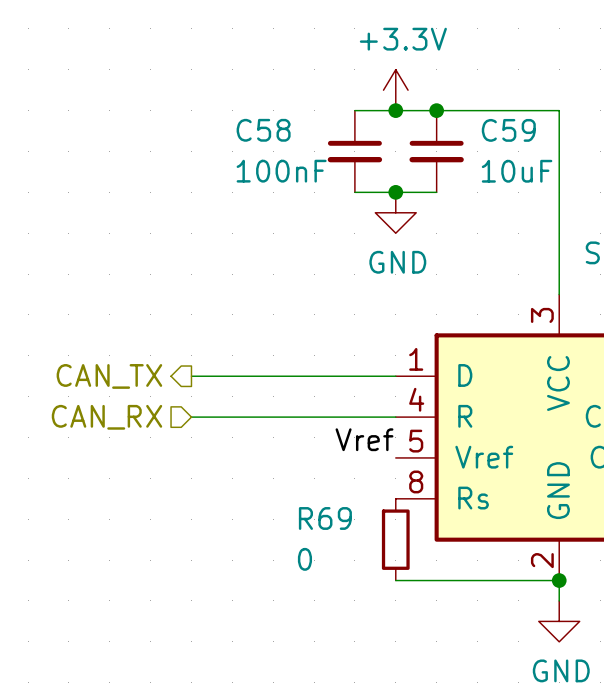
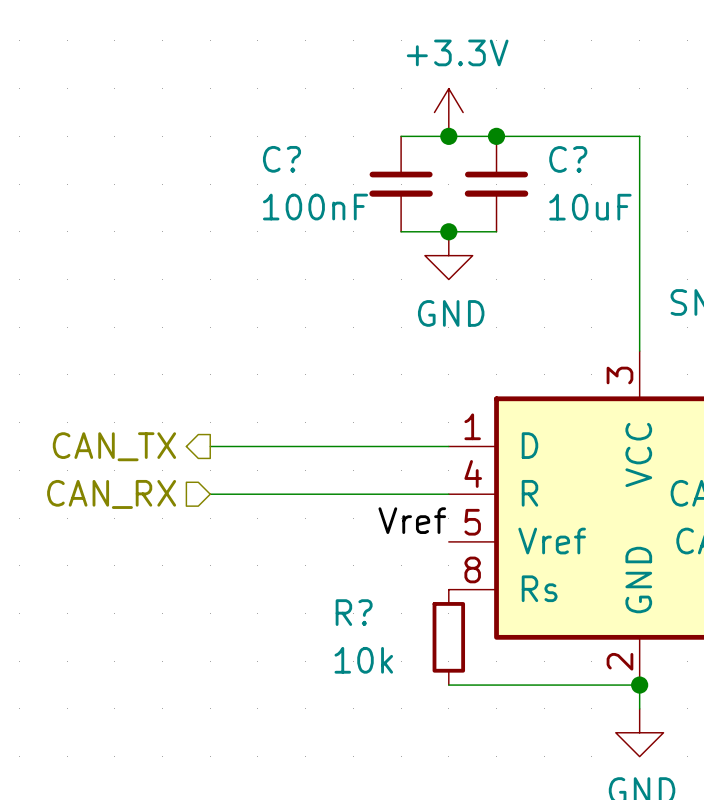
C58 name: C58 (263, 130) -> C? (281, 159)
C59 name: C59 (508, 130) -> C? (568, 159)
R69 name: R69 (325, 518) -> R? (354, 612)
R69 value: 0 (304, 559) -> 10k (363, 660)

